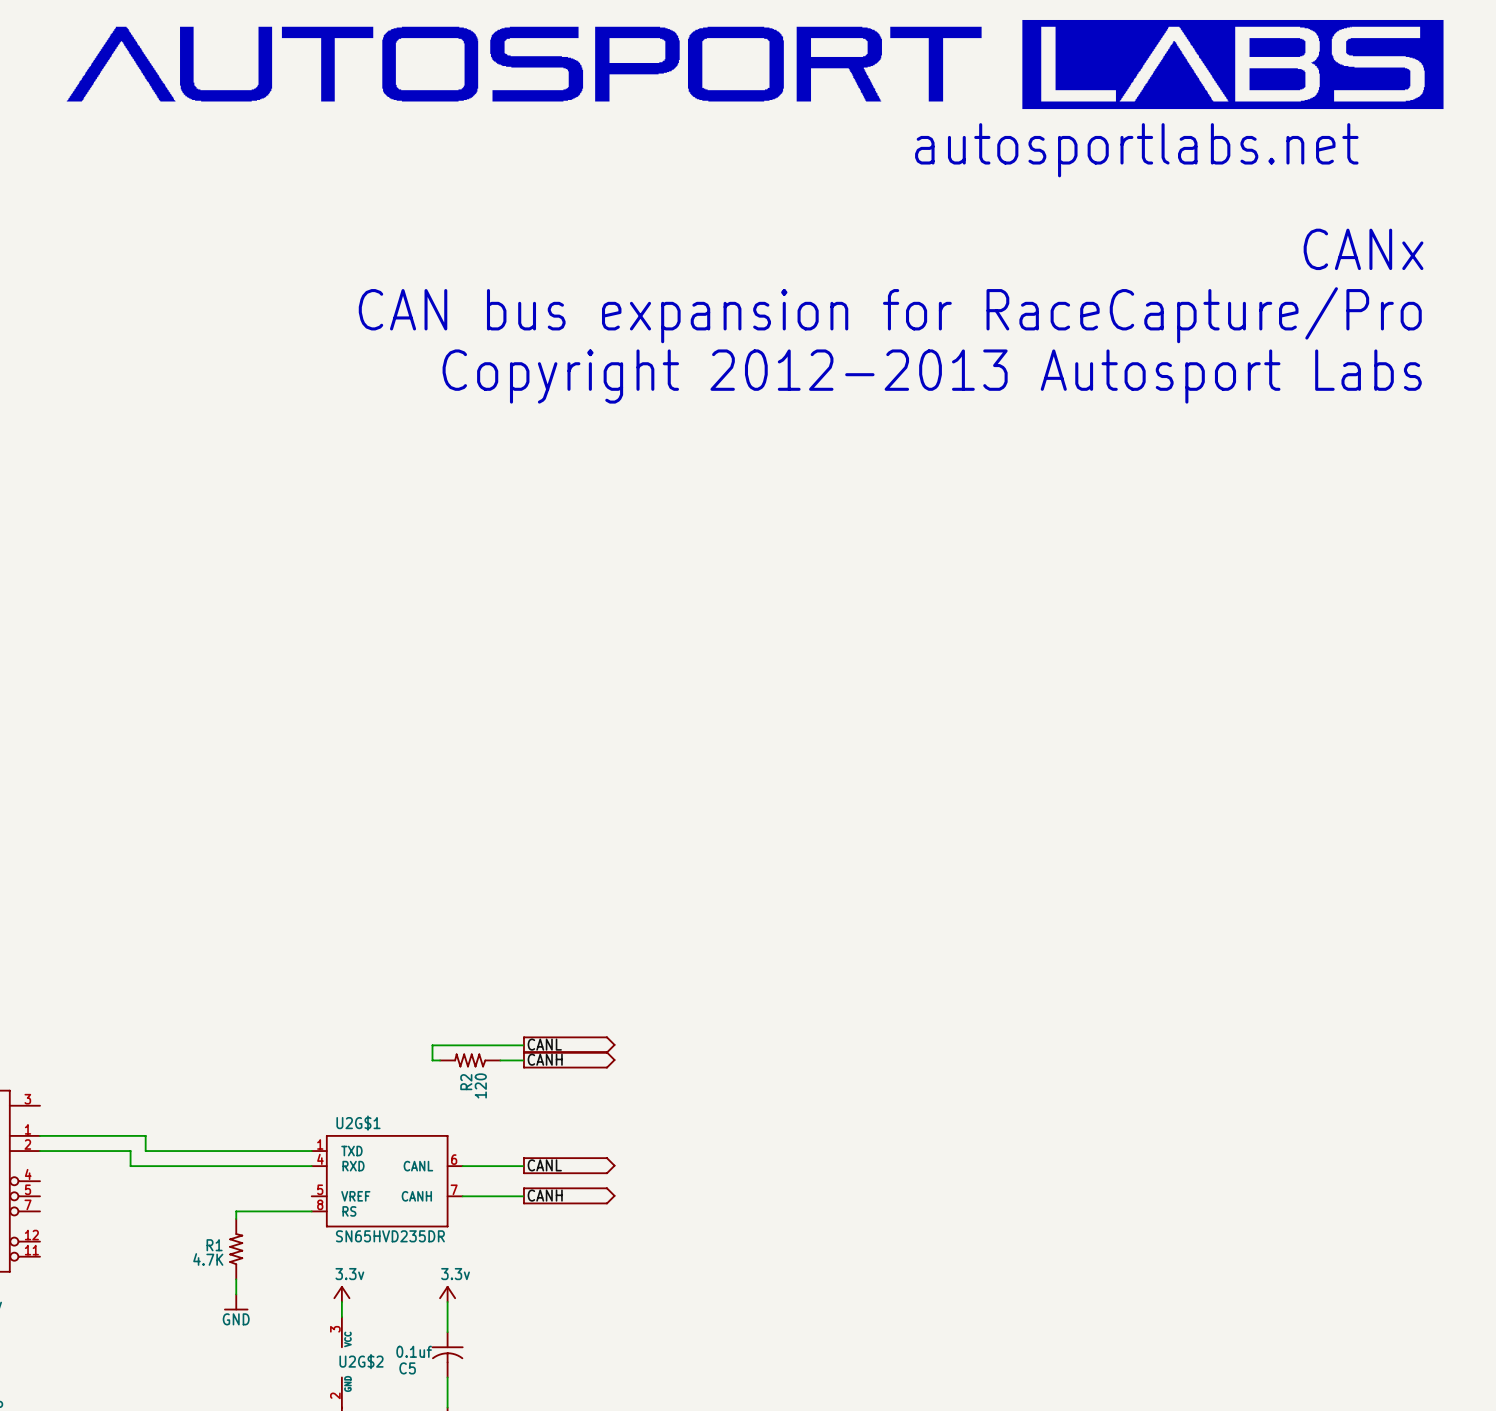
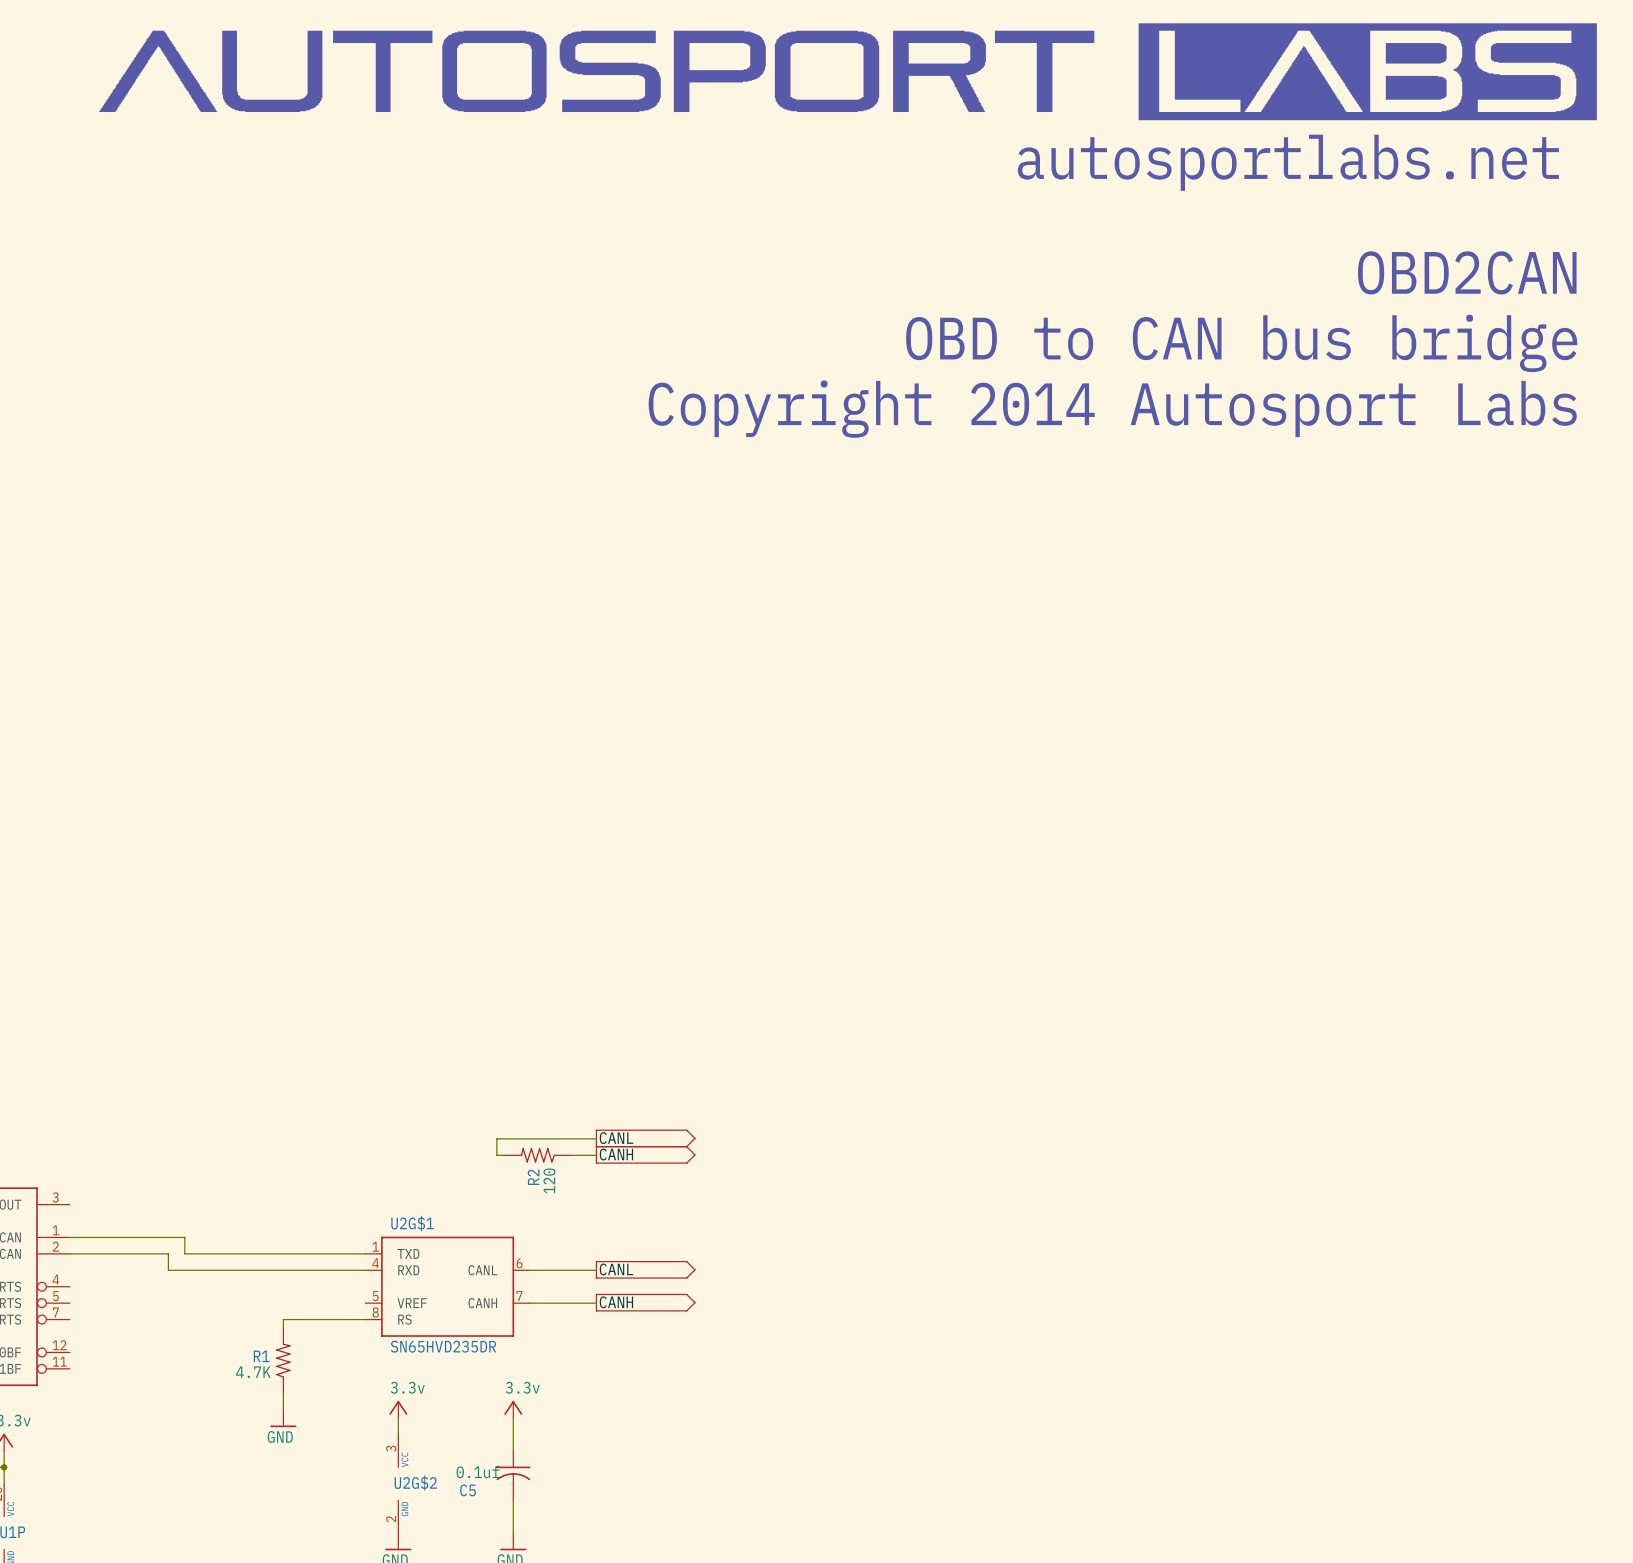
text: CANx (1363, 249) -> OBD2CAN (1467, 272)
text: CAN bus expansion for RaceCapture/Pro (890, 315) -> OBD to CAN bus bridge (1241, 343)
text: Copyright 2012-2013 Autosport Labs (932, 376) -> Copyright 2014 Autosport Labs (1112, 409)

